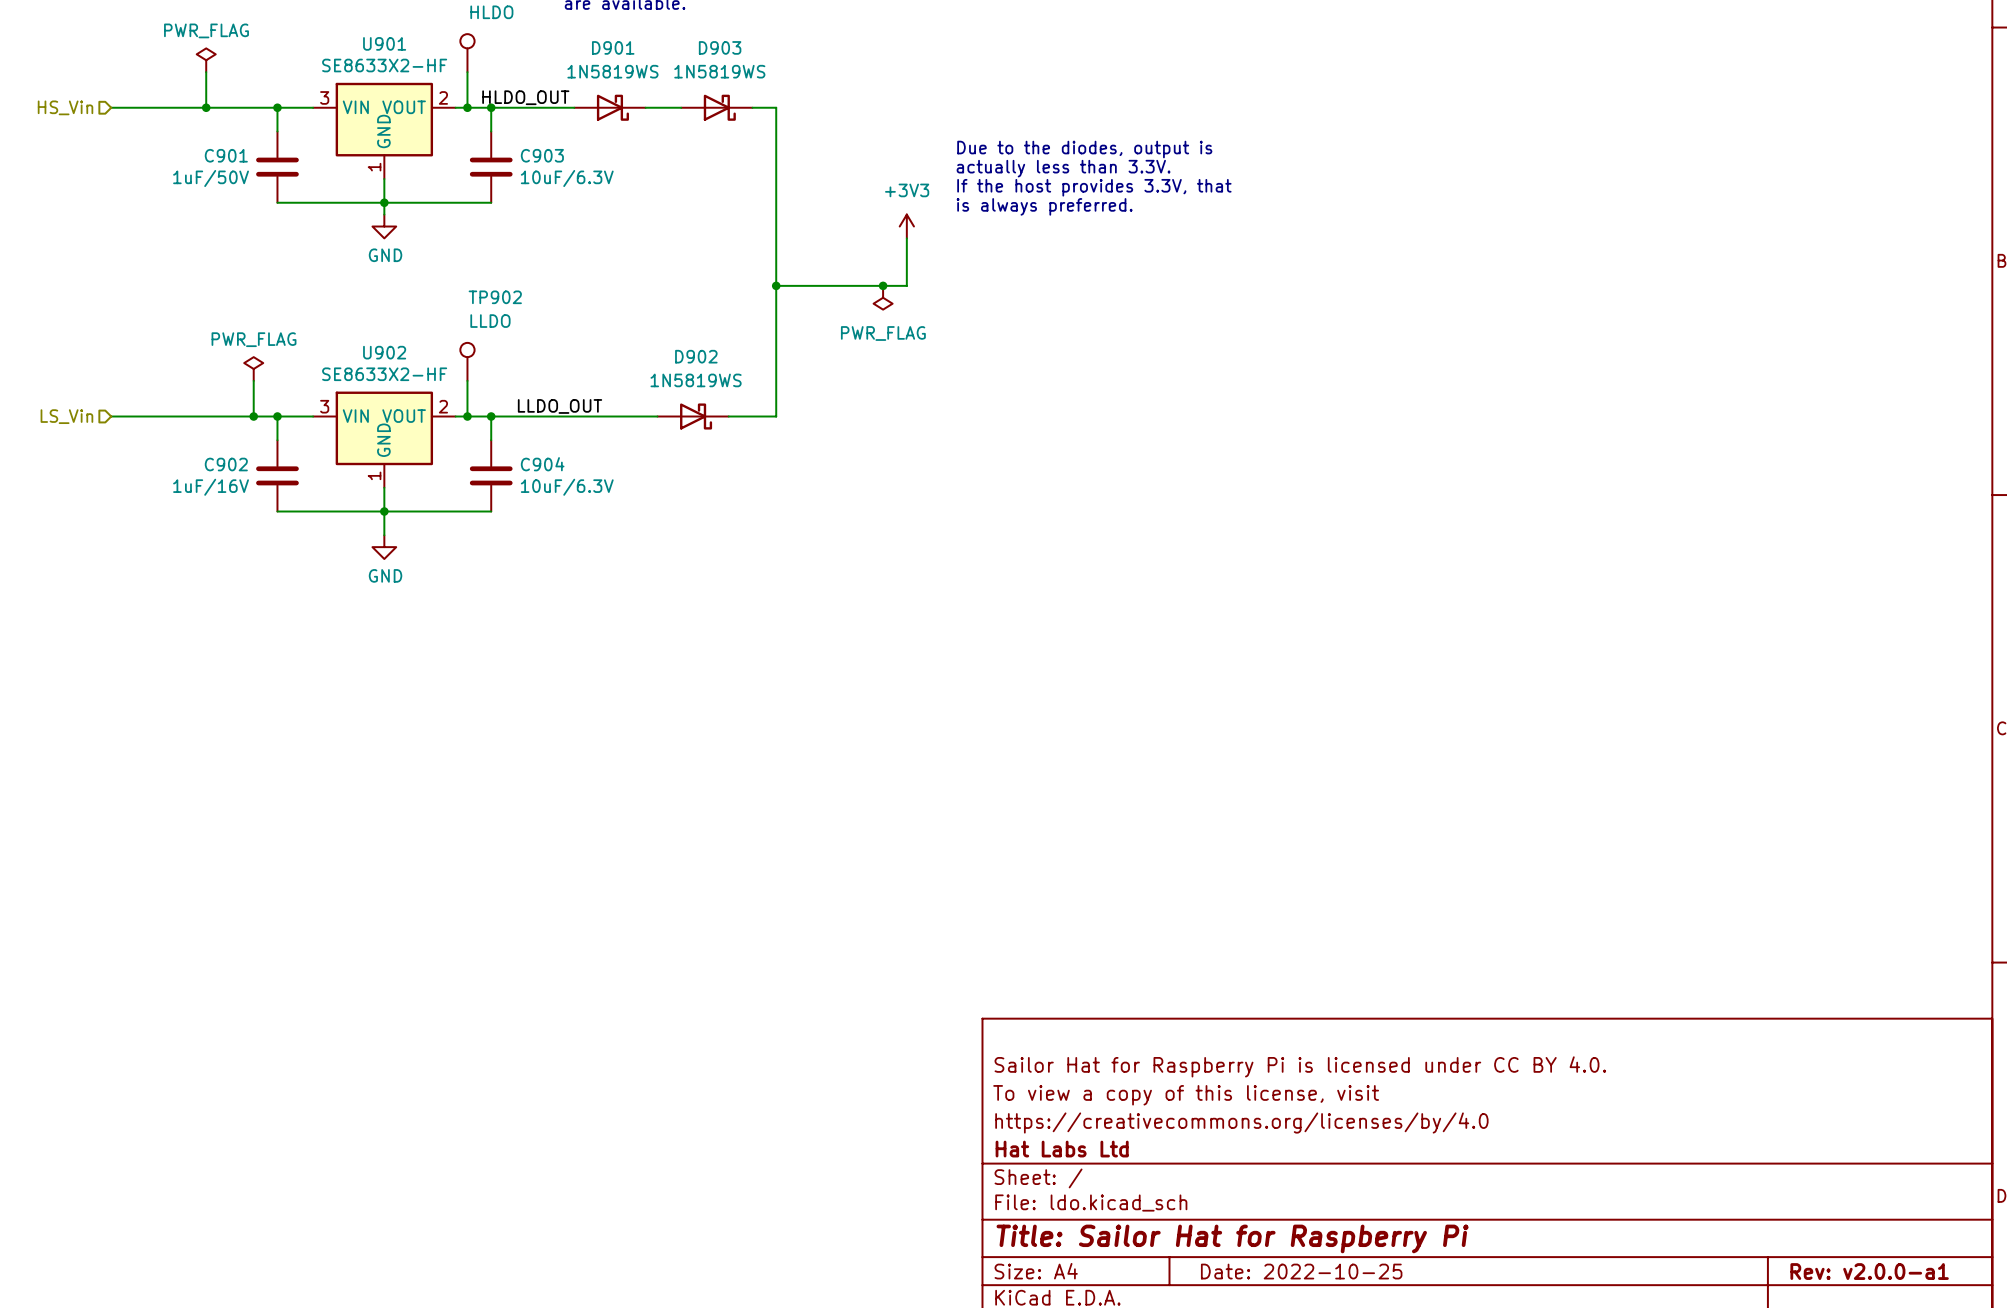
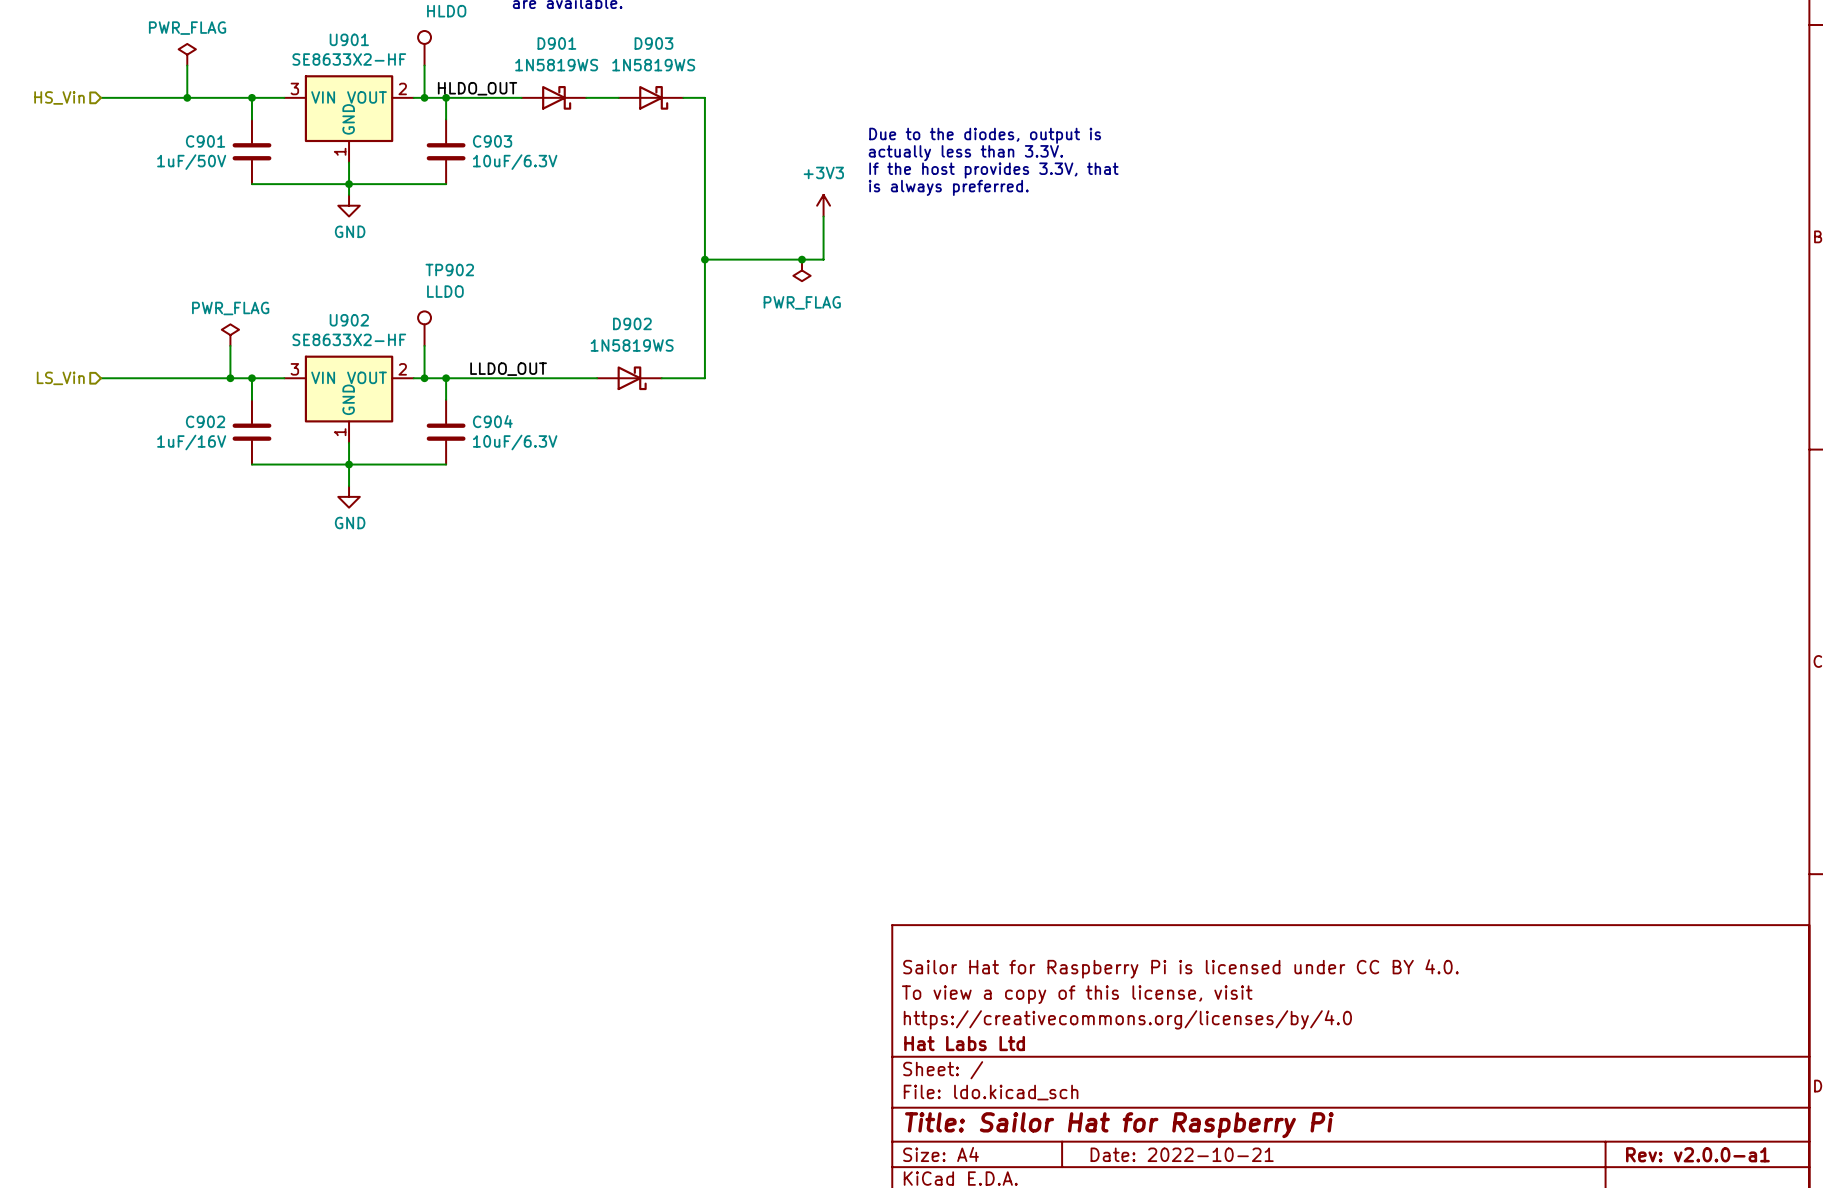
title block: Date: 2022-10-25 (1301, 1271) -> Date: 2022-10-21 (1182, 1154)

